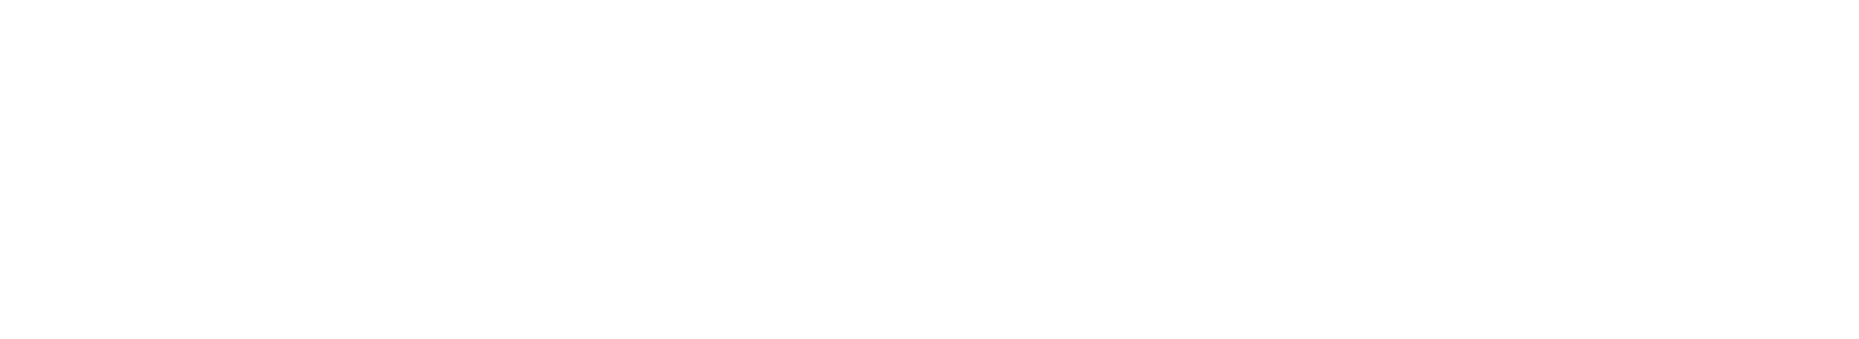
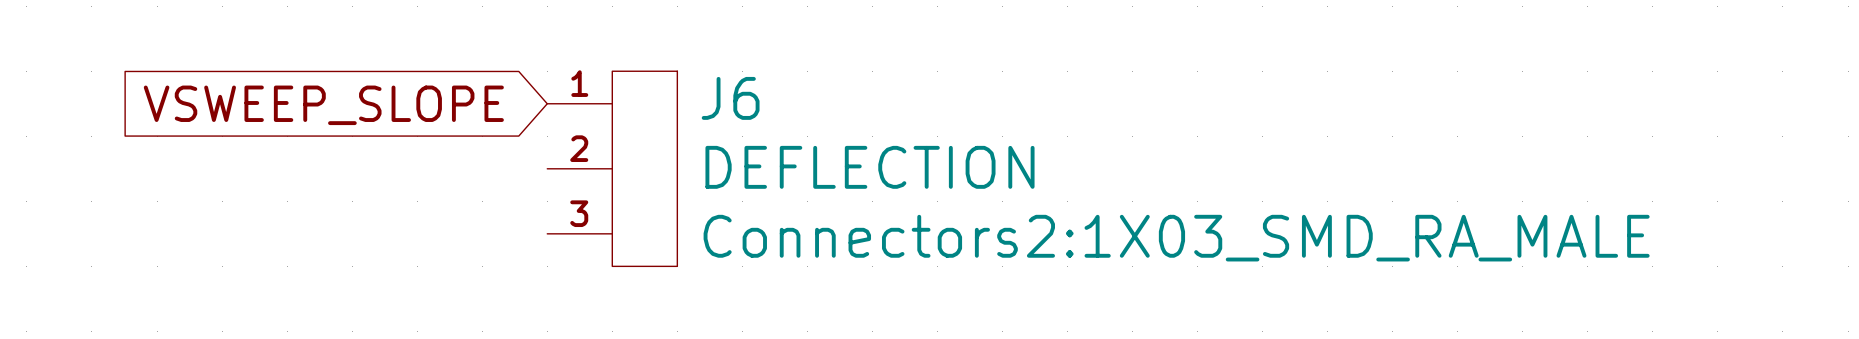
global label: none -> VSWEEP_SLOPE (323, 105)
J6: none -> DEFLECTION (612, 168)

